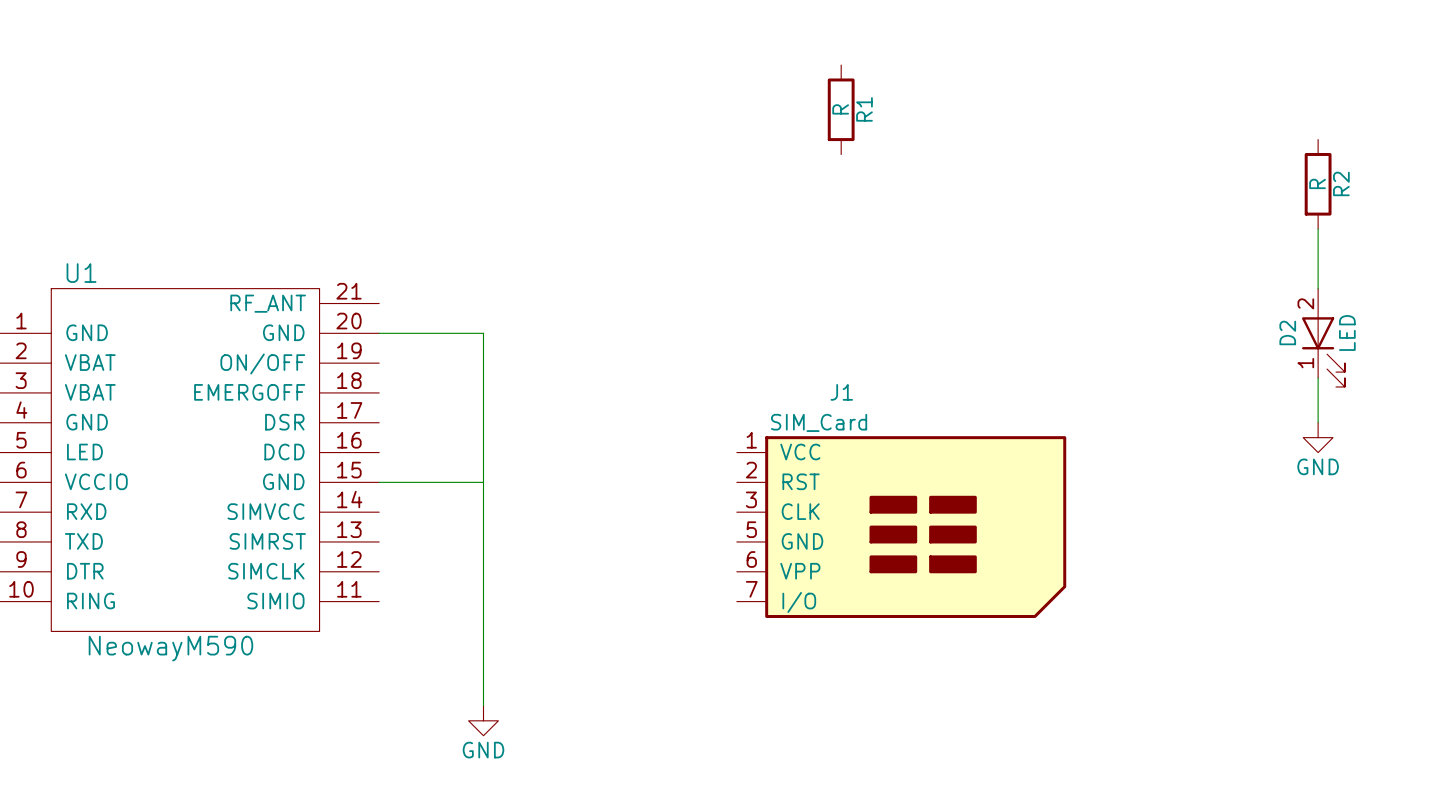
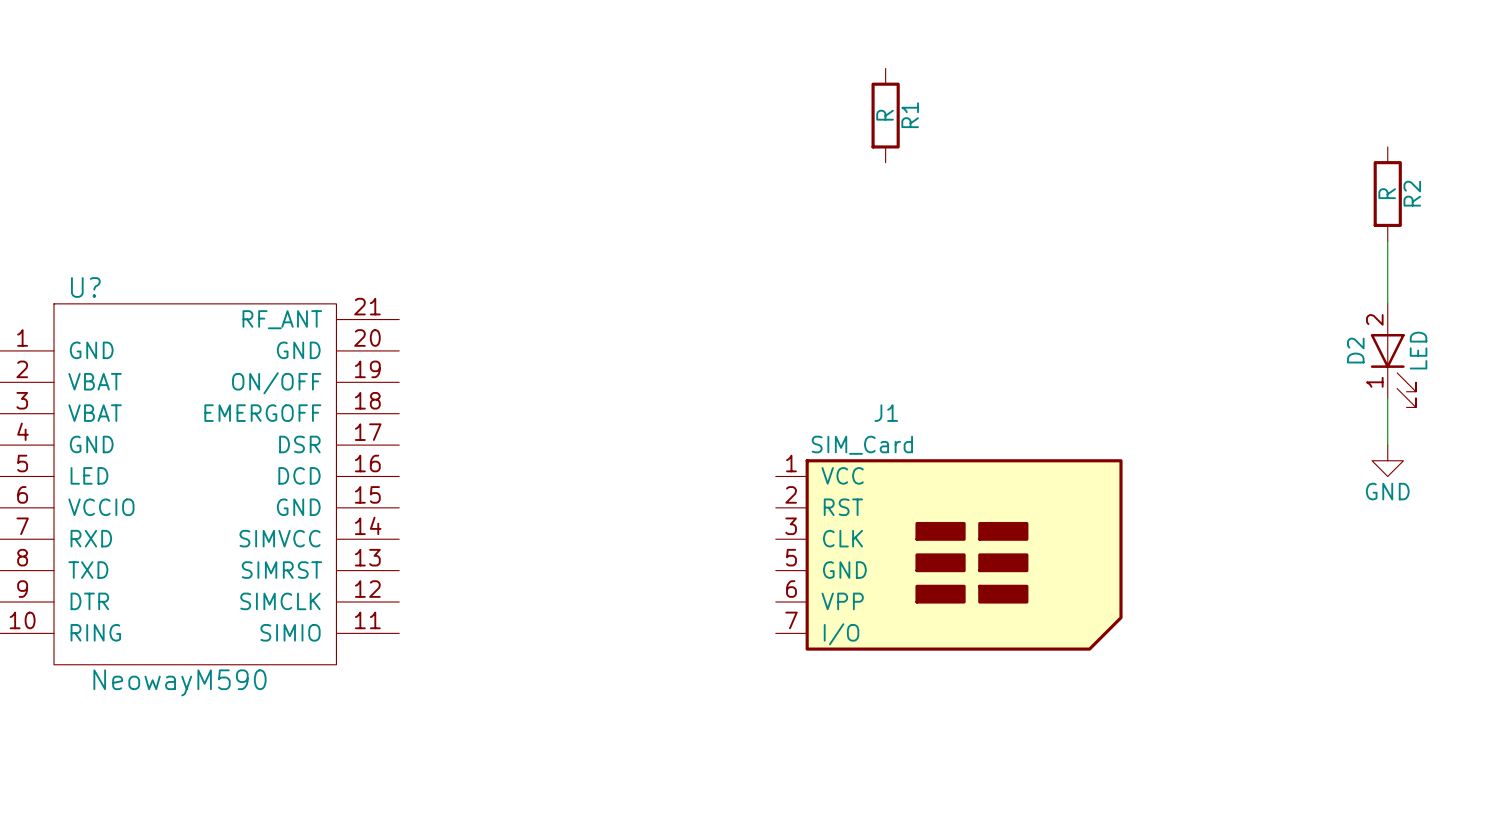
U1 name: U1 (81, 273) -> U? (85, 287)
wire: (379, 333) (483, 333) (483, 705) -> none
wire: (379, 482) (483, 482) -> none
power symbol: GND (483, 720) -> none

